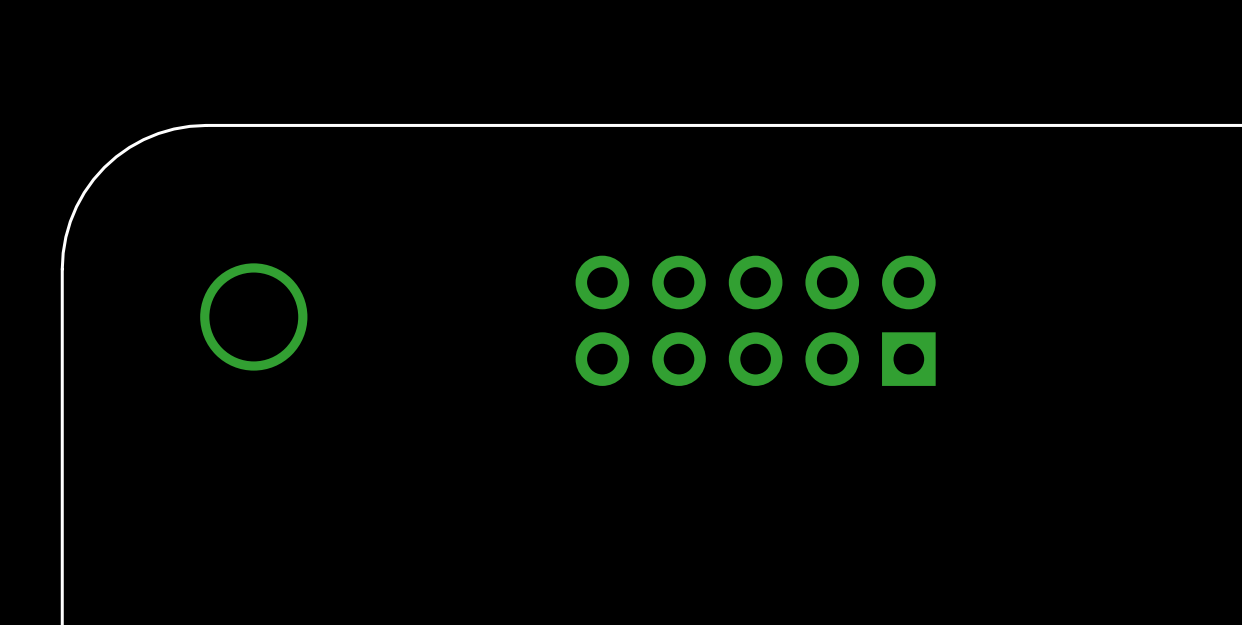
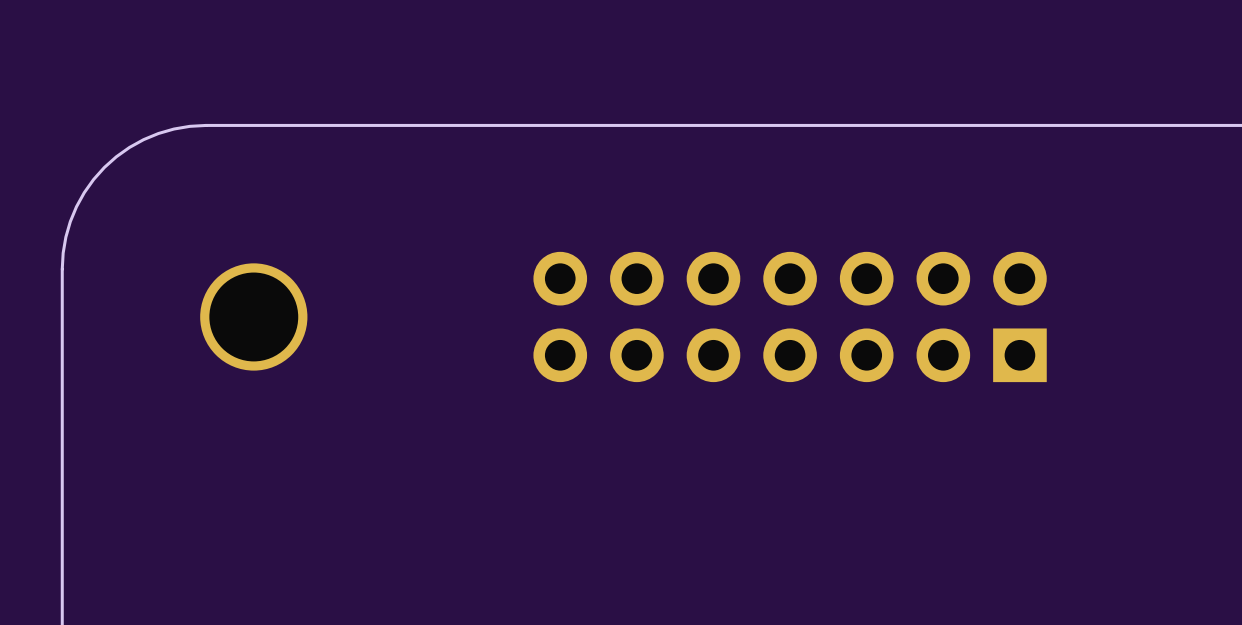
part: none -> (790, 316)
part: (755, 320) -> none

